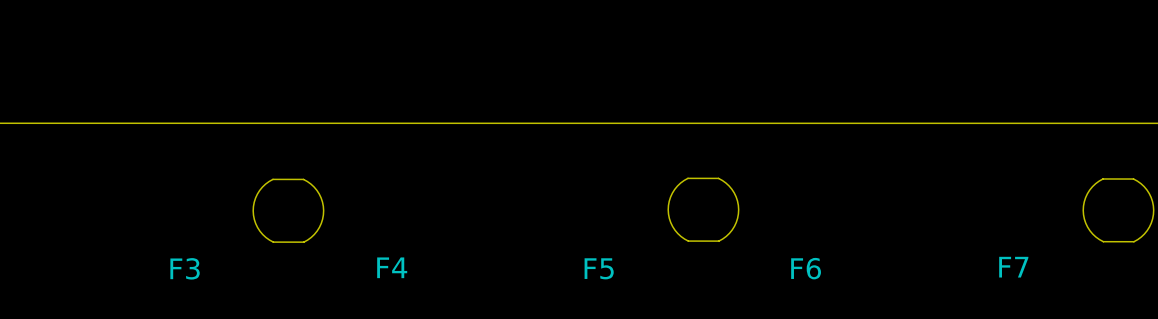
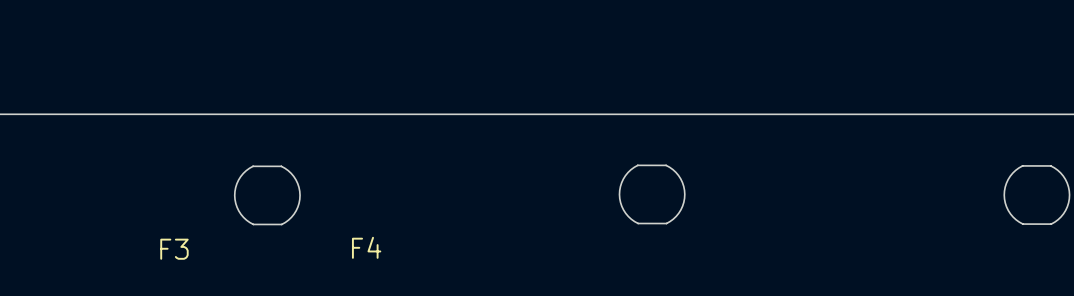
text: F7 (1013, 267) -> none
text: F5 (599, 268) -> none
text: F6 (806, 268) -> none

